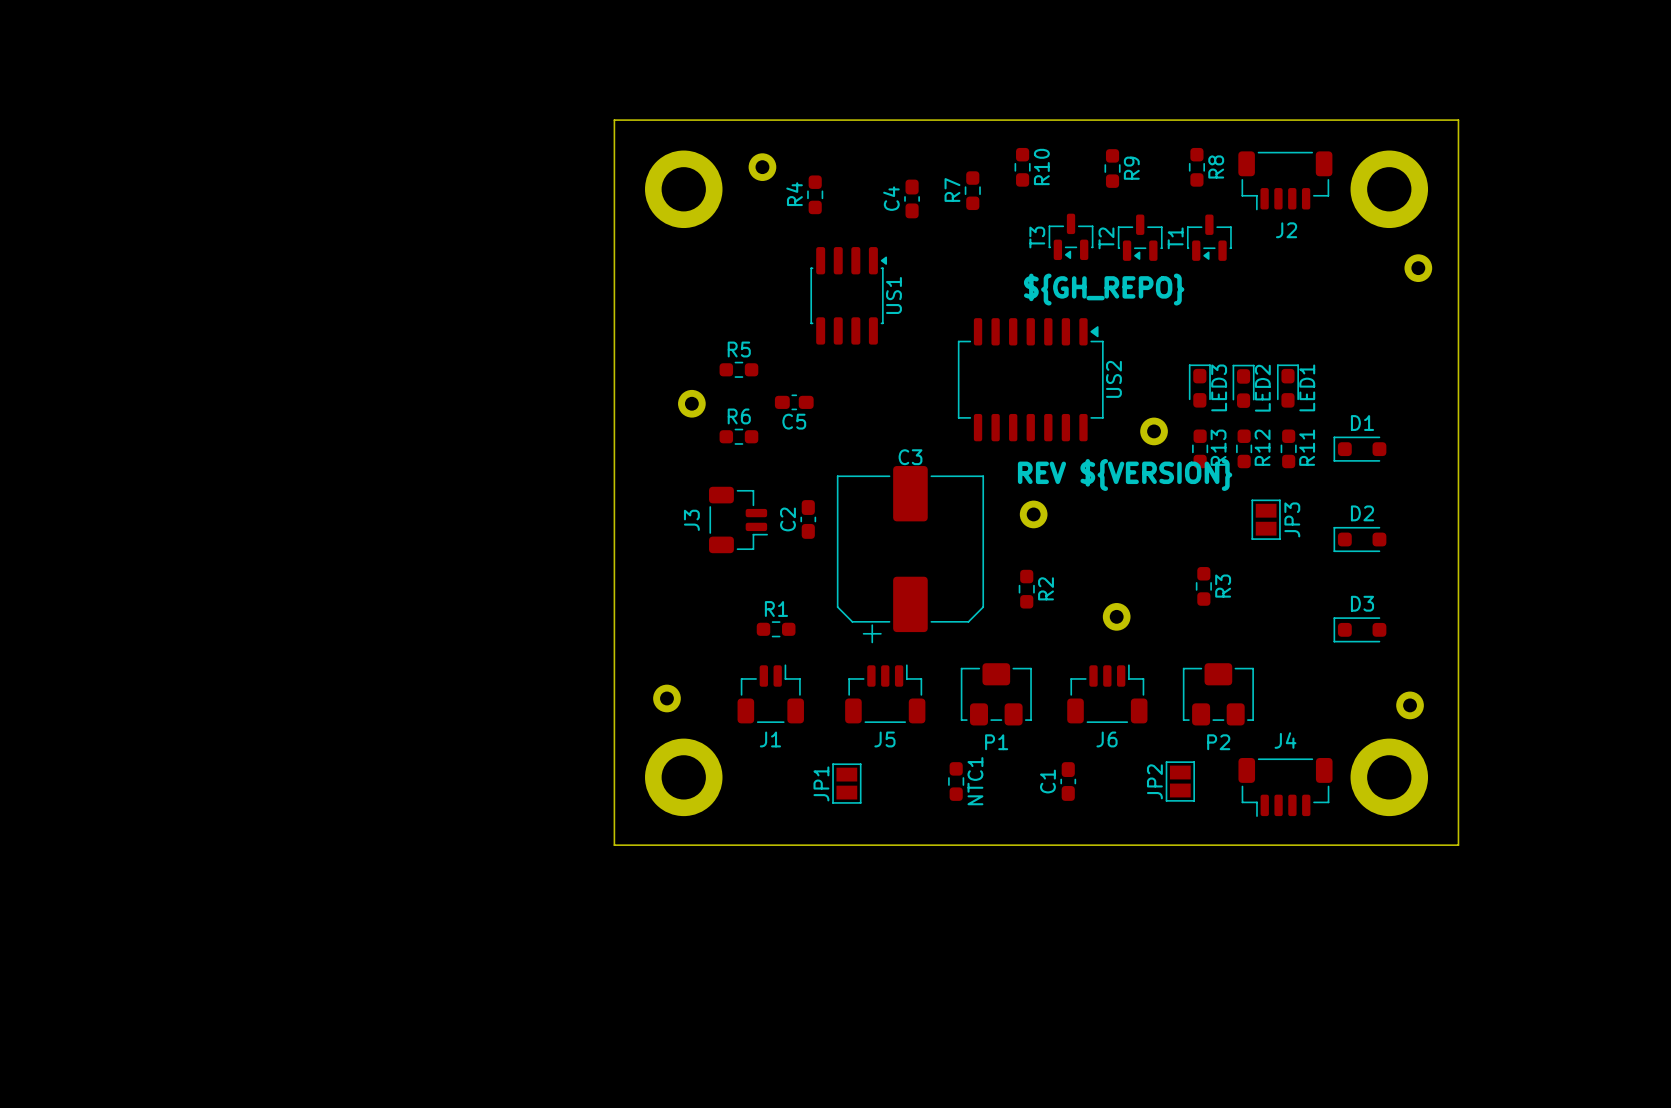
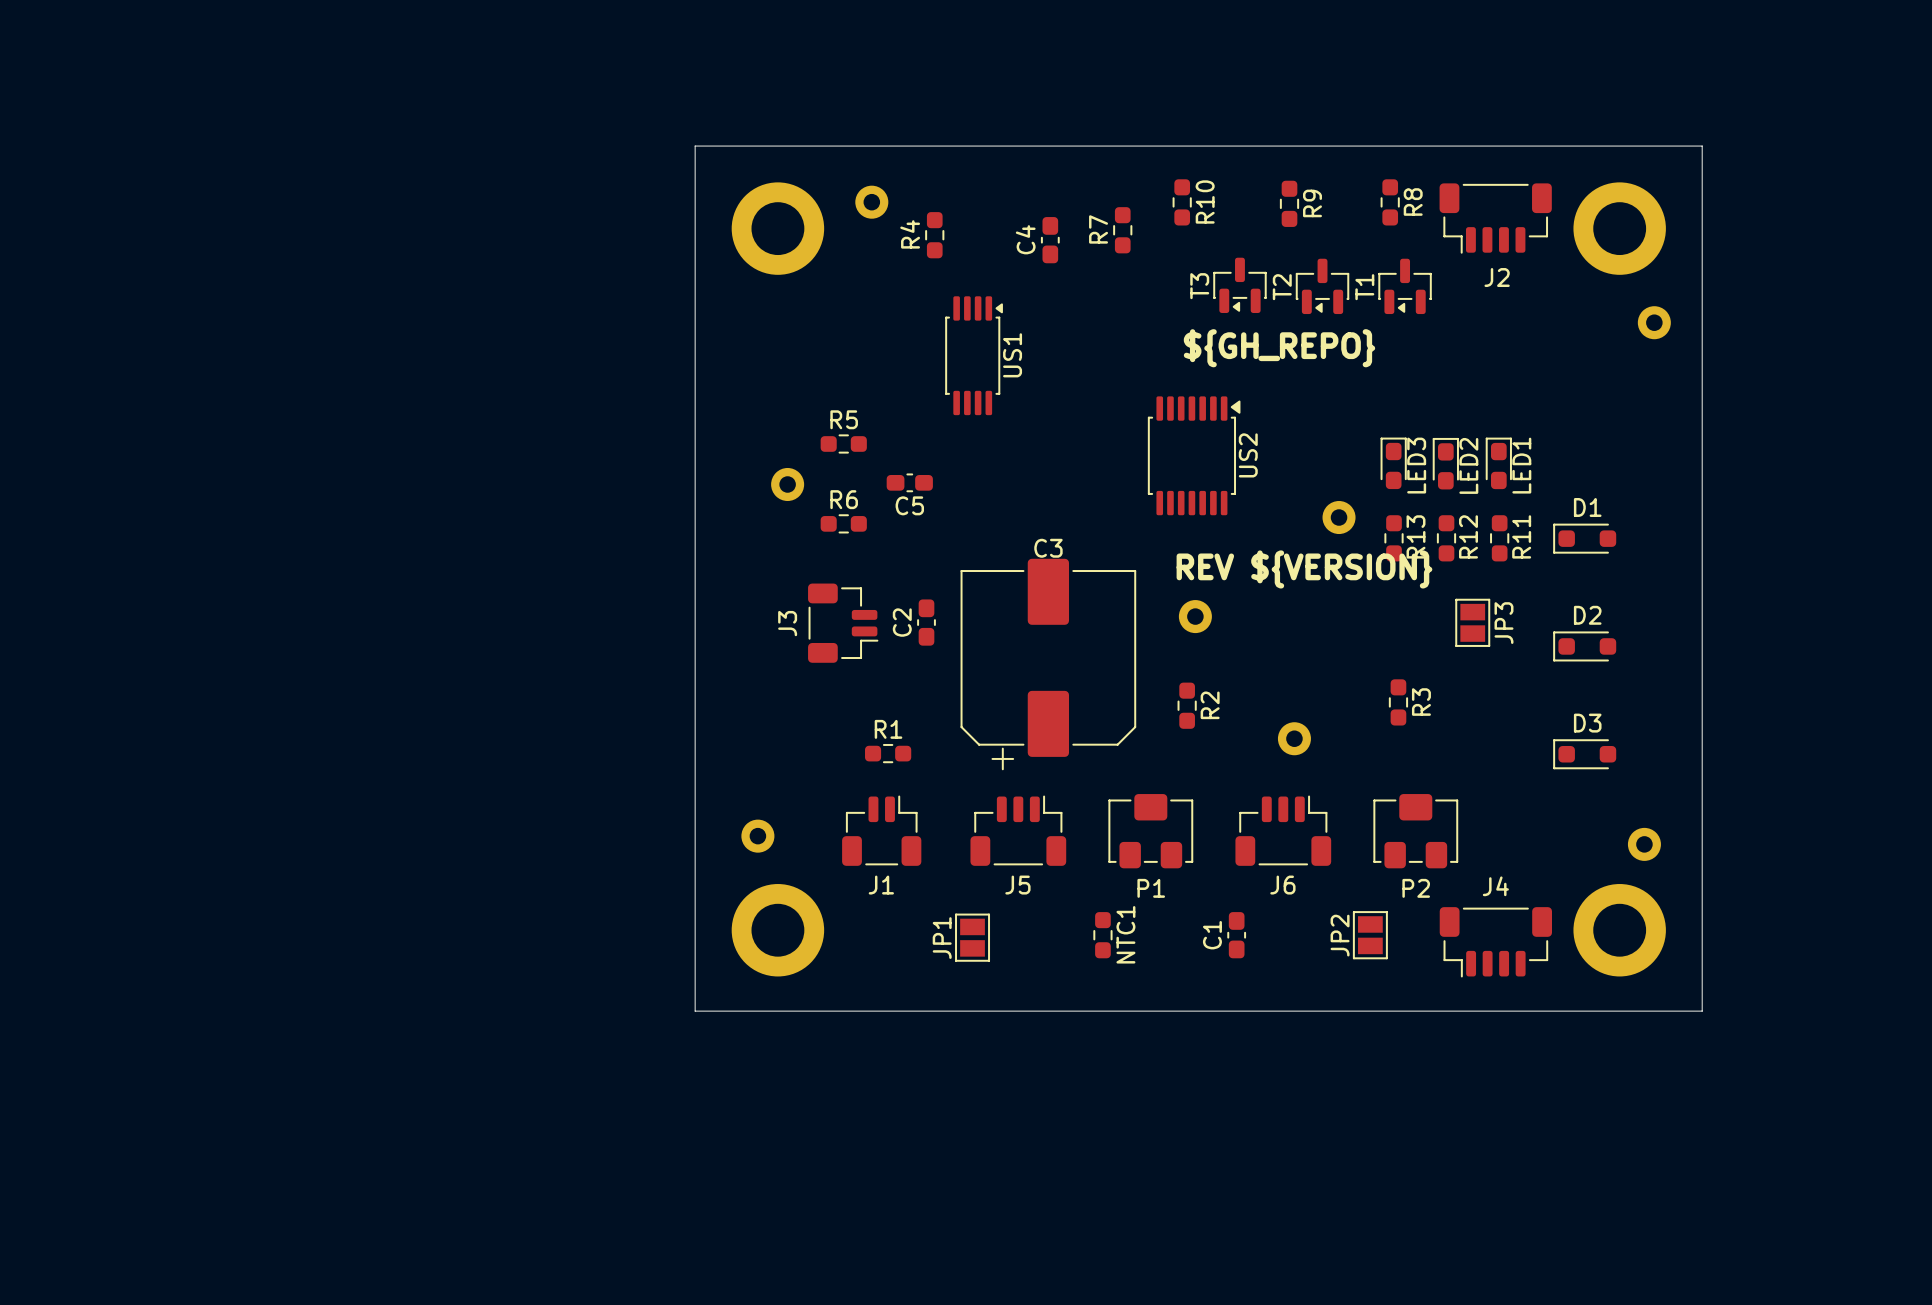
US1 footprint: [810, 247, 888, 345] -> [945, 296, 1003, 416]
US2 footprint: [957, 318, 1104, 442] -> [1147, 396, 1241, 516]
US2 name position: US2 (1113, 379) -> US2 (1248, 455)

